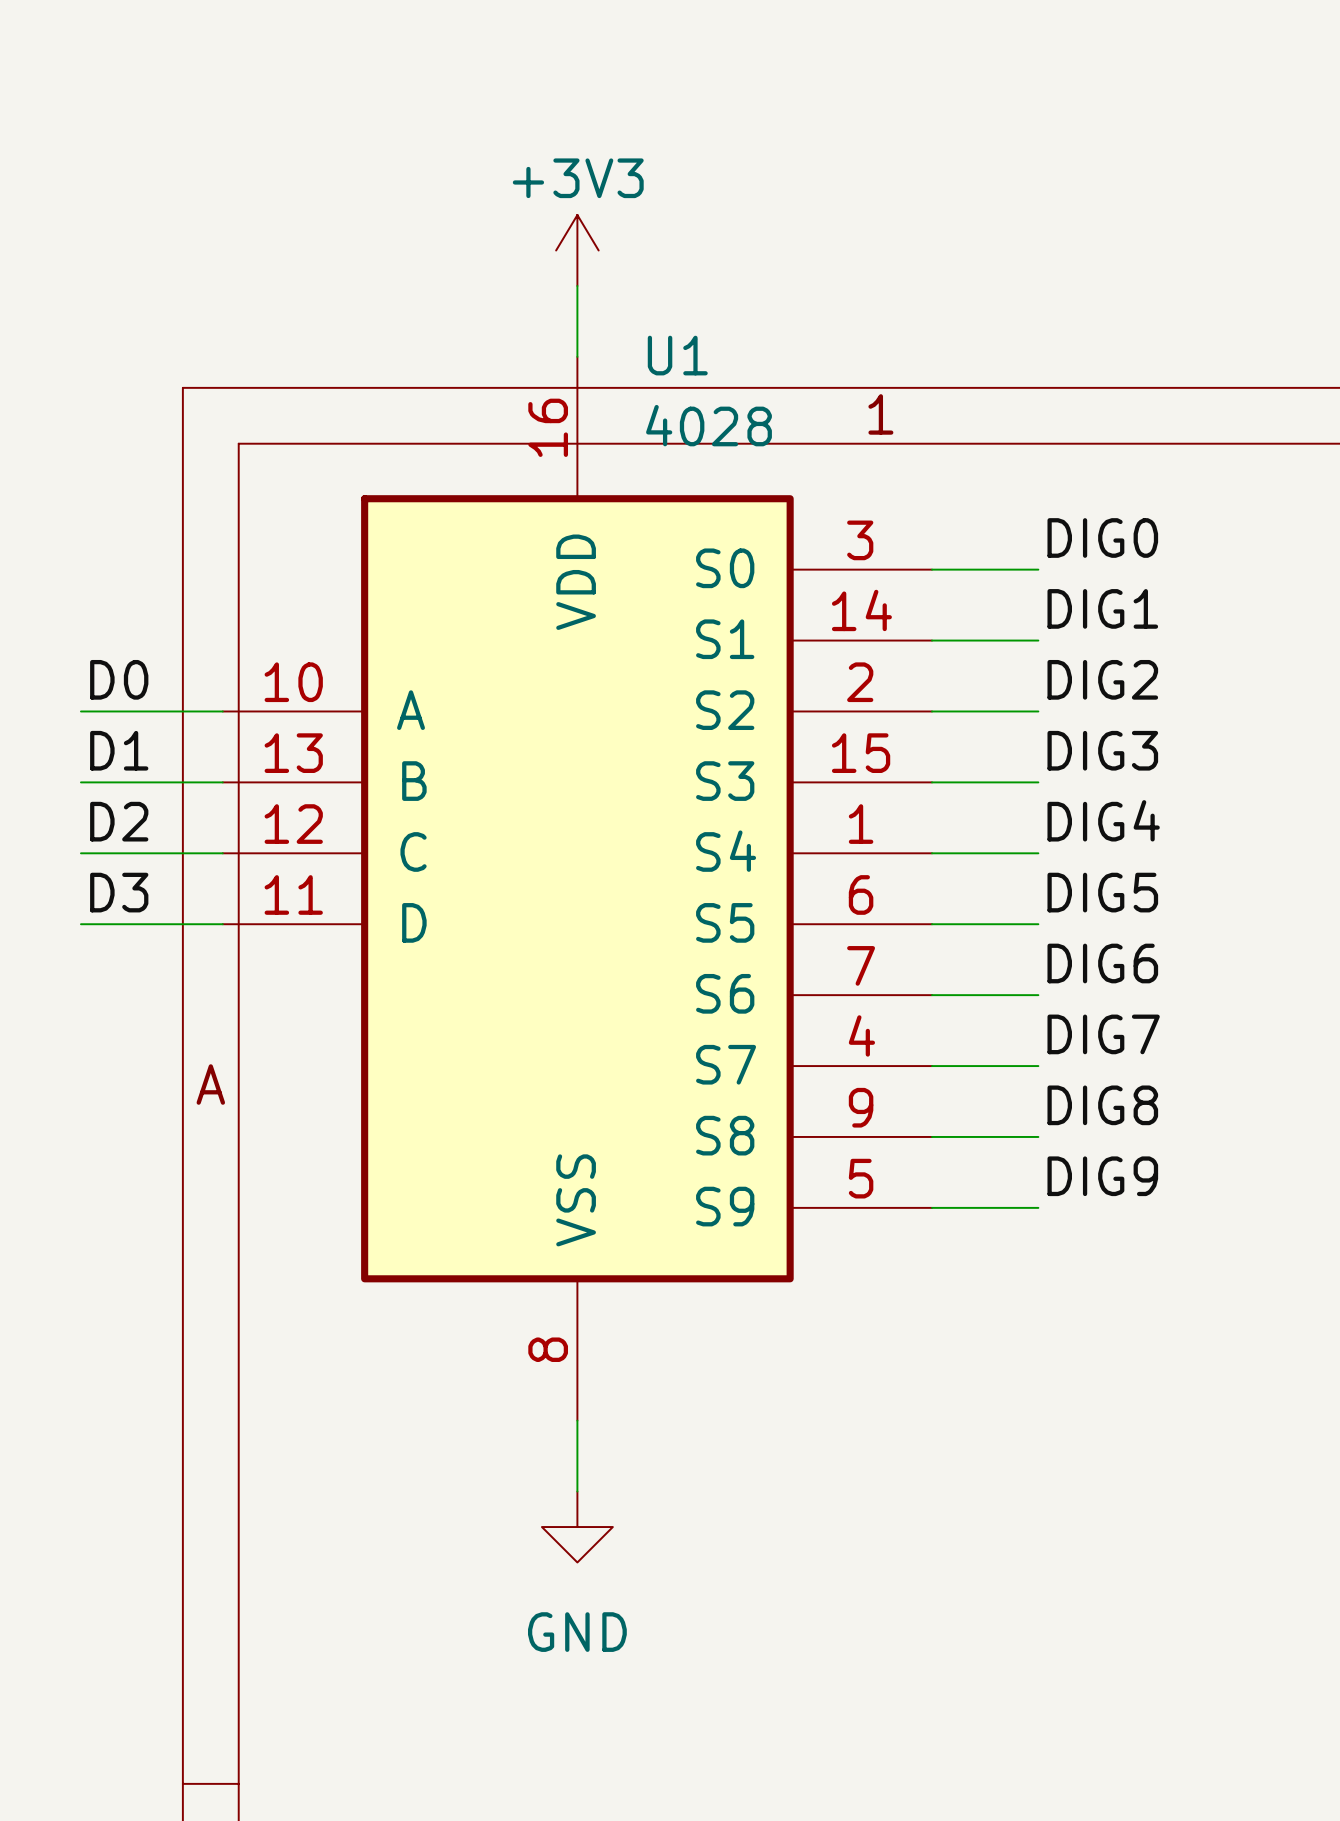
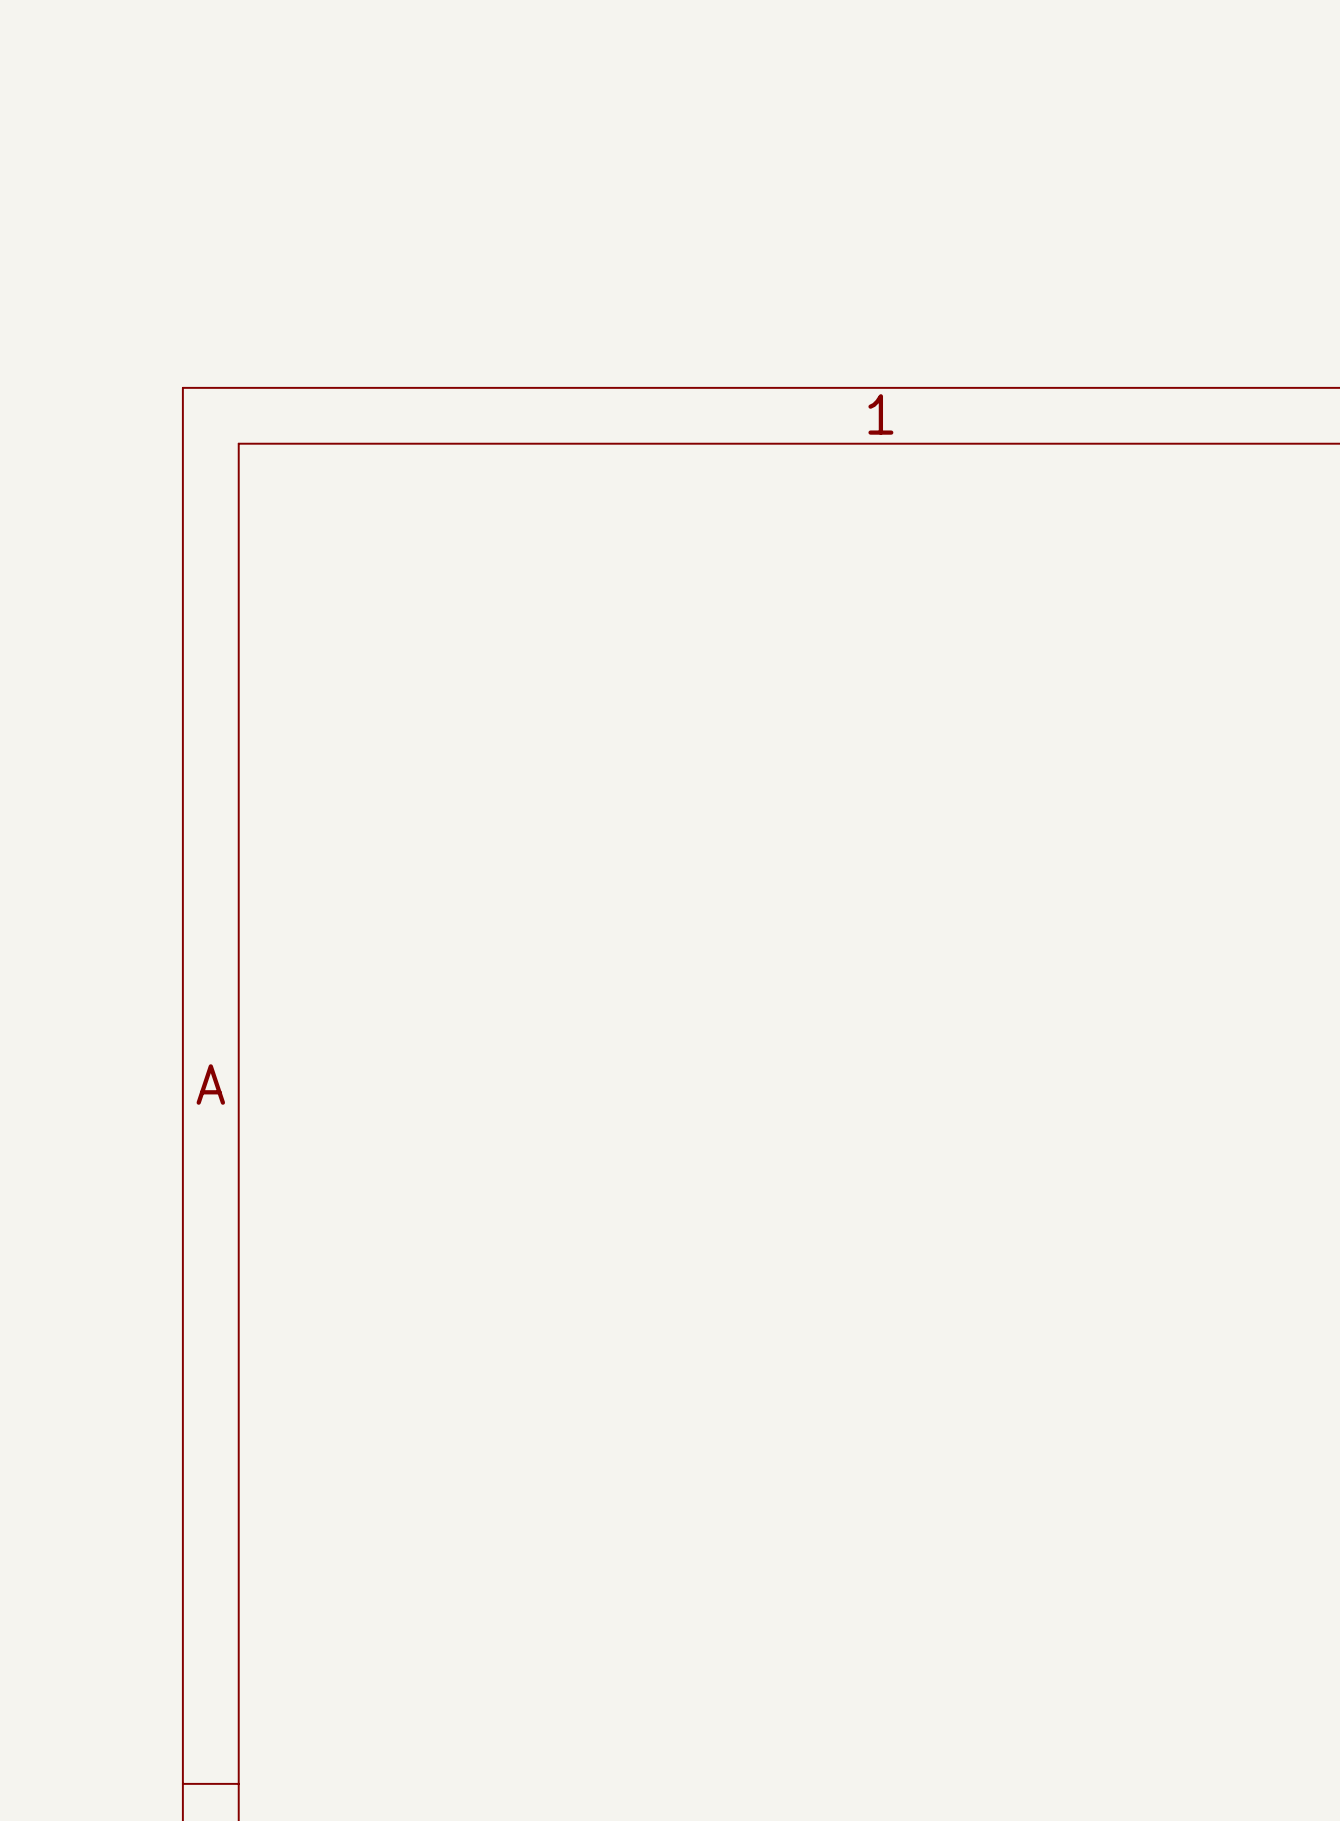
power symbol: +3V3 (577, 250) -> none
wire: (577, 285) (577, 356) -> none
label: DIG0 (1102, 537) -> none
wire: (931, 569) (1038, 569) -> none
label: DIG1 (1102, 608) -> none
wire: (931, 640) (1038, 640) -> none
label: D0 (119, 679) -> none
label: DIG2 (1102, 679) -> none
wire: (80, 711) (222, 711) -> none
wire: (931, 711) (1038, 711) -> none
label: D1 (119, 750) -> none
label: DIG3 (1102, 750) -> none
wire: (80, 782) (222, 782) -> none
wire: (931, 782) (1038, 782) -> none
label: DIG4 (1103, 820) -> none
label: D2 (119, 821) -> none
wire: (80, 853) (222, 853) -> none
wire: (931, 853) (1038, 853) -> none
U1: 4028 (577, 888) -> none
label: D3 (119, 892) -> none
label: DIG5 (1102, 892) -> none
wire: (80, 924) (222, 924) -> none
wire: (931, 924) (1038, 924) -> none
label: DIG6 (1102, 963) -> none
wire: (931, 995) (1038, 995) -> none
label: DIG7 (1103, 1034) -> none
wire: (931, 1066) (1038, 1066) -> none
label: DIG8 (1102, 1105) -> none
wire: (931, 1136) (1038, 1136) -> none
label: DIG9 (1102, 1176) -> none
wire: (931, 1207) (1038, 1207) -> none
wire: (577, 1420) (577, 1491) -> none
power symbol: GND (577, 1527) -> none

